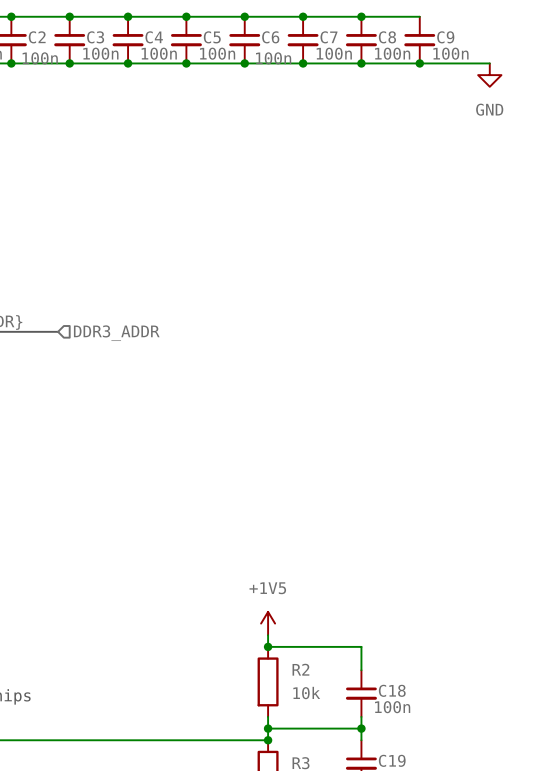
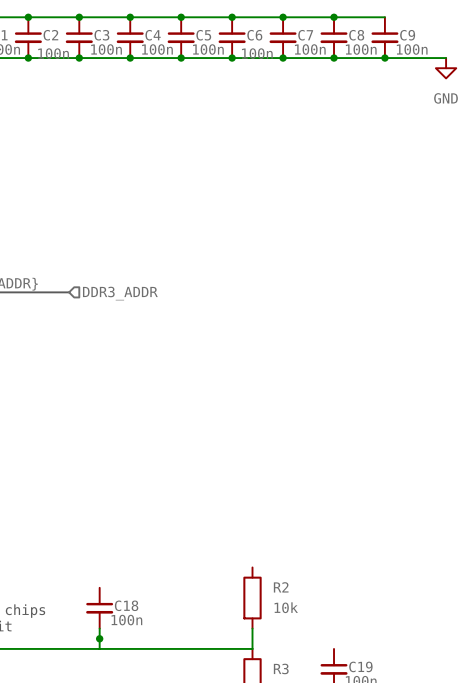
power symbol: +1V5 (268, 623) -> none
wire: (268, 635) (268, 646) (361, 646) (361, 670) -> none
junction: (268, 646) -> none
C18 position: (361, 693) -> (99, 608)
wire: none -> (99, 628) (99, 648)
wire: (361, 716) (361, 740) -> none
junction: none -> (99, 638)
wire: (268, 728) (361, 728) -> none
junction: (268, 728) -> none
junction: (361, 728) -> none
junction: (268, 740) -> none

